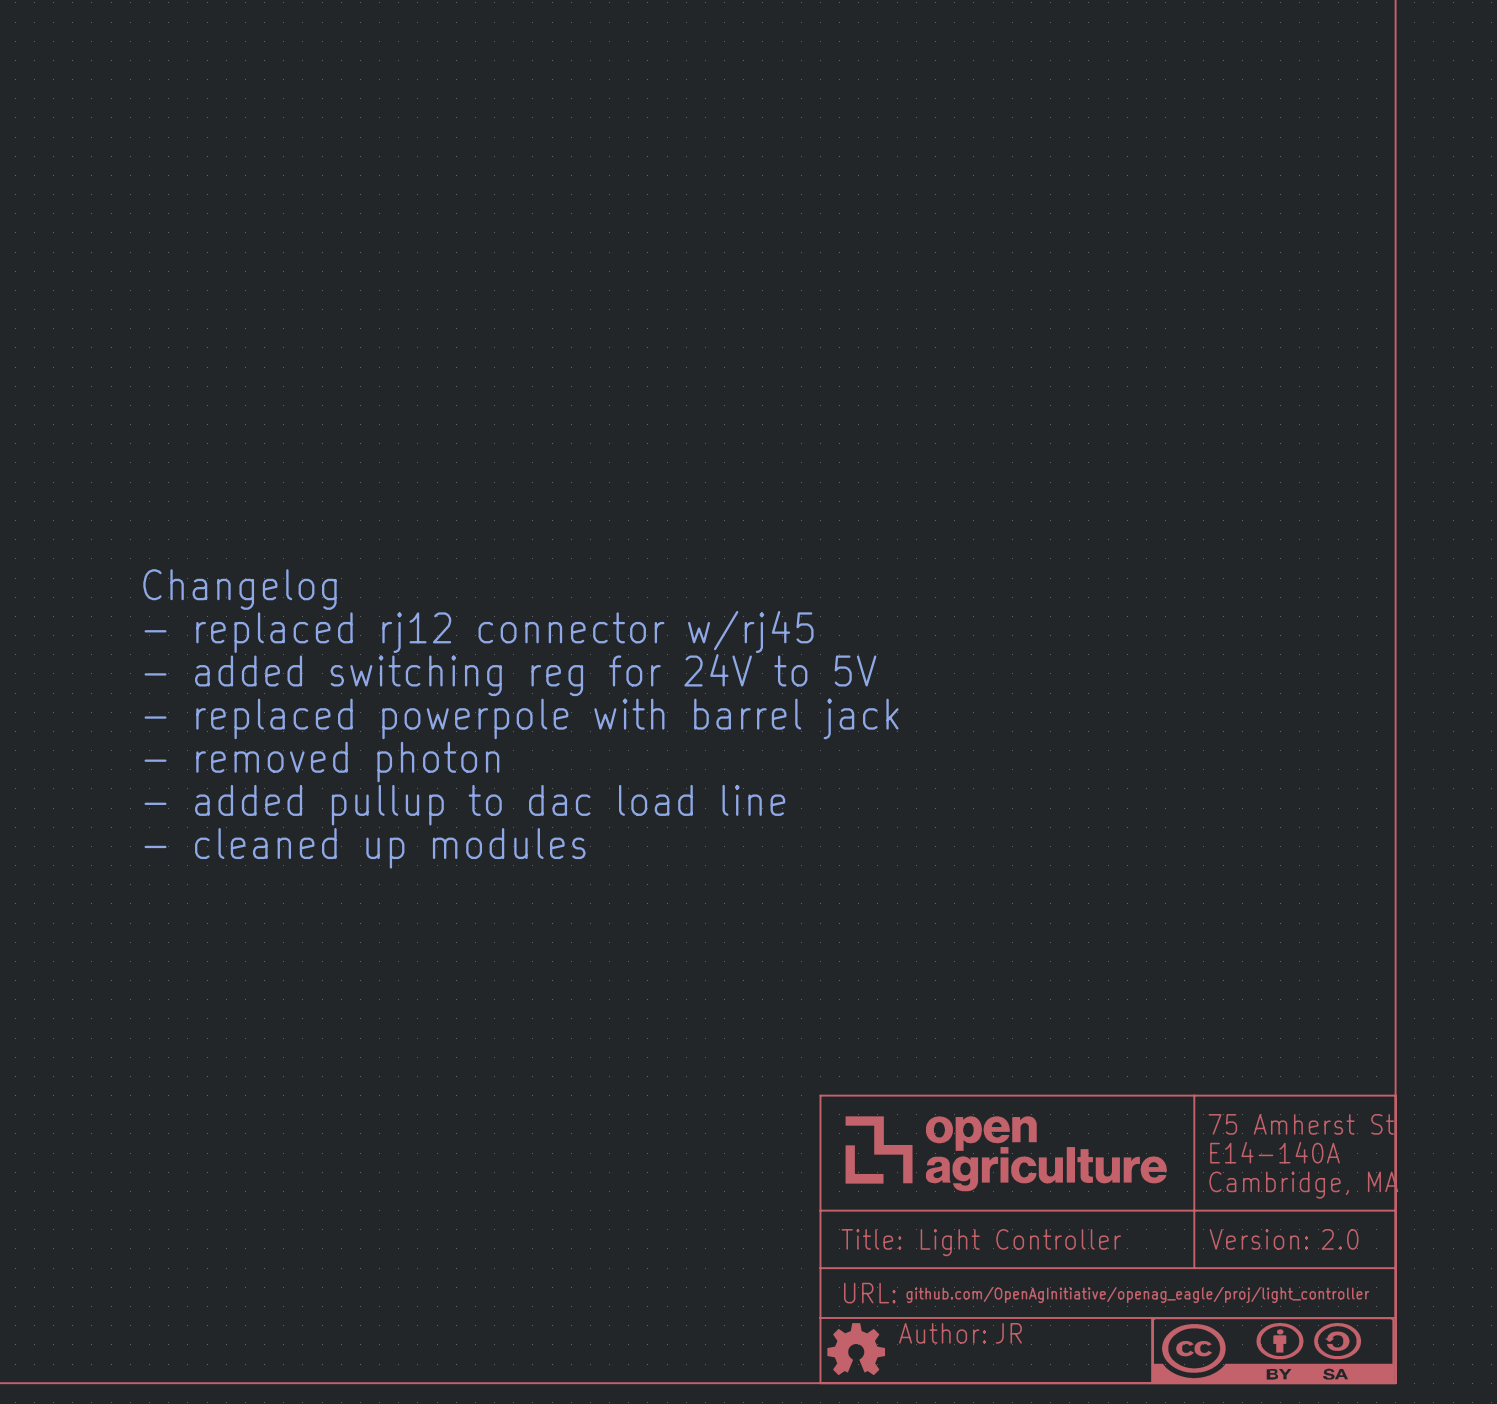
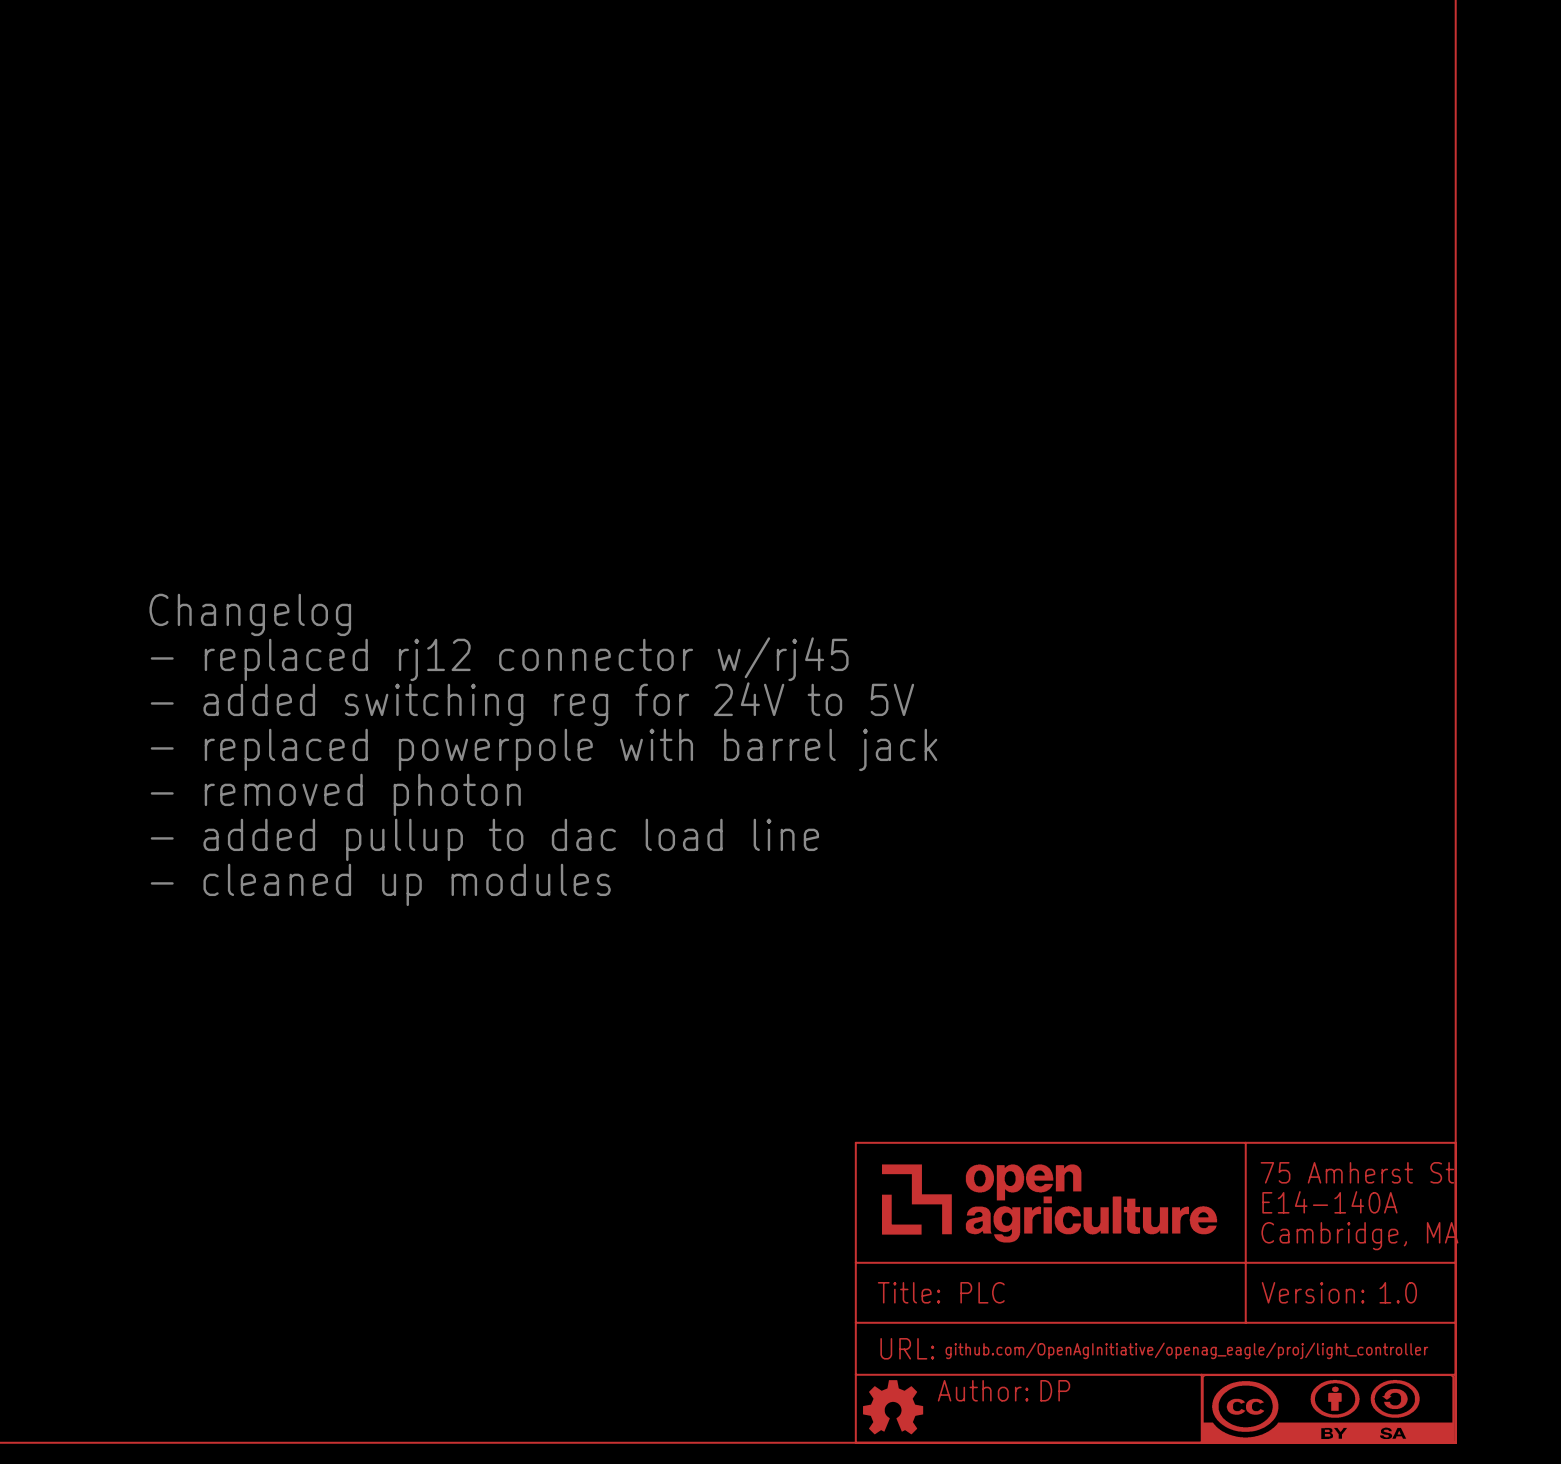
part text: 2.0 (1340, 1239) -> 1.0 (1398, 1292)
part text: Light Controller (1020, 1242) -> PLC (982, 1292)
part text: JR (1008, 1333) -> DP (1055, 1390)

